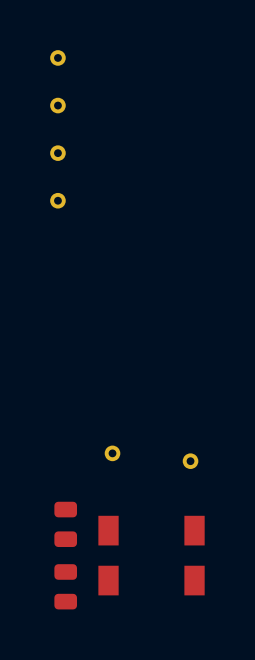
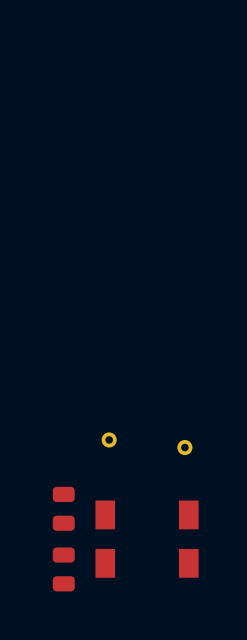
part: (57, 57) -> none
part: (57, 105) -> none
part: (57, 153) -> none
part: (57, 200) -> none

